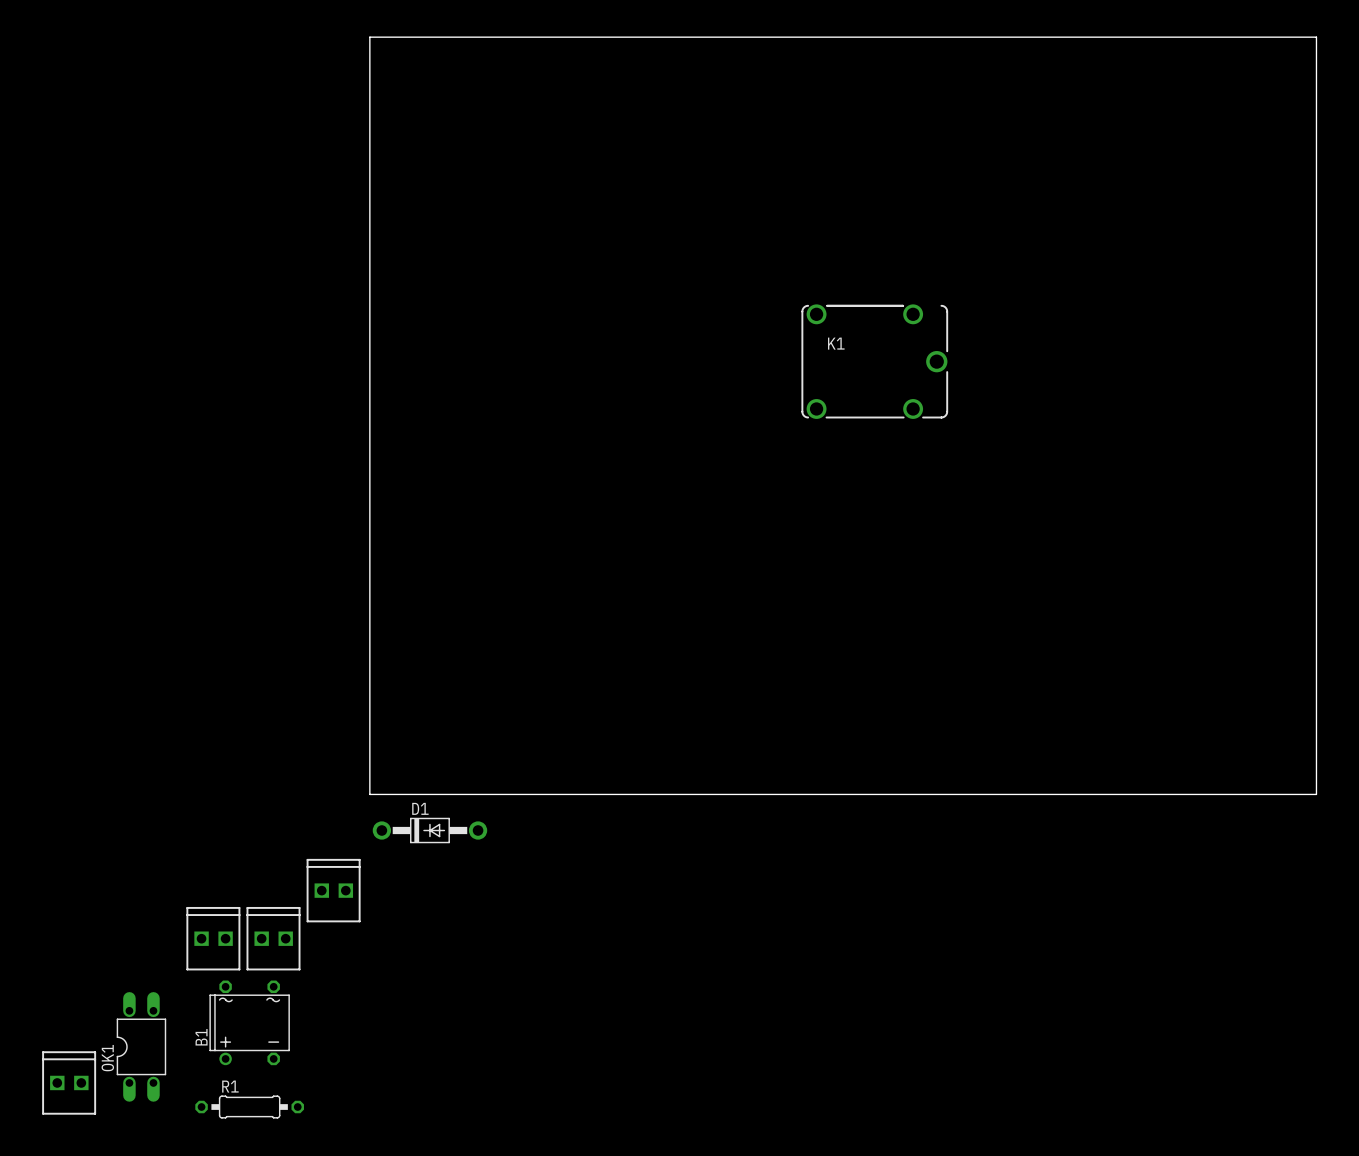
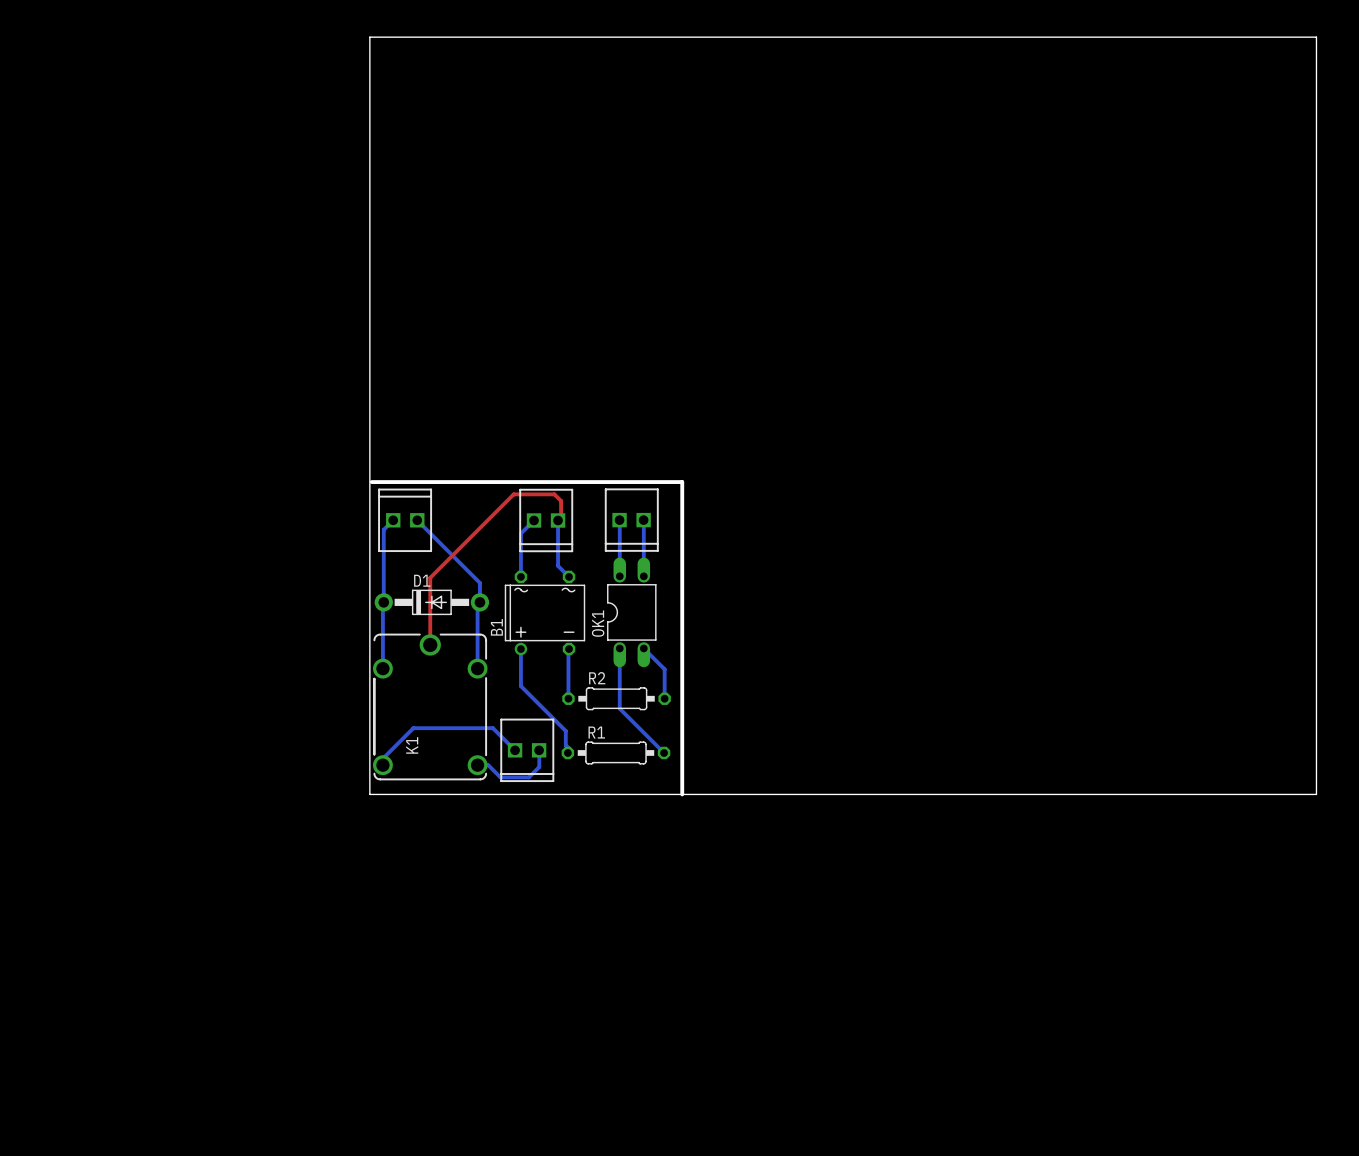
K1 rotation: 0° (874, 361) -> 90° counterclockwise (430, 706)
K1 position: (874, 361) -> (430, 706)
board edge: none -> (371, 482) (682, 482) (682, 794)
bottom track: none -> (393, 520) (383, 529) (382, 668)
part: none -> (405, 520)
bottom track: none -> (417, 520) (479, 582) (479, 602) (477, 604) (477, 668)
bottom track: none -> (534, 520) (520, 533) (520, 576)
part: none -> (546, 520)
bottom track: none -> (558, 520) (558, 565) (569, 576)
top track: none -> (558, 520) (561, 517) (561, 500) (554, 494) (513, 494) (430, 577) (430, 644)
bottom track: none -> (619, 520) (619, 576)
part: none -> (631, 520)
bottom track: none -> (643, 520) (643, 576)
bottom track: none -> (619, 648) (619, 708) (664, 752)
bottom track: none -> (643, 648) (664, 669) (664, 698)
bottom track: none -> (520, 649) (520, 686) (565, 731) (567, 752)
bottom track: none -> (569, 649) (568, 698)
R2: none -> (616, 698)
bottom track: none -> (515, 750) (492, 728) (413, 728) (382, 758) (382, 765)
part: none -> (527, 750)
bottom track: none -> (539, 750) (539, 766) (528, 777) (500, 777) (488, 765) (477, 765)
D1 position: (429, 830) -> (431, 602)
part: (333, 890) -> none
part: (213, 938) -> none
part: (273, 938) -> none
B1 position: (249, 1022) -> (544, 612)
OK1 position: (141, 1046) -> (631, 612)
part: (69, 1082) -> none
R1 position: (249, 1107) -> (615, 752)

